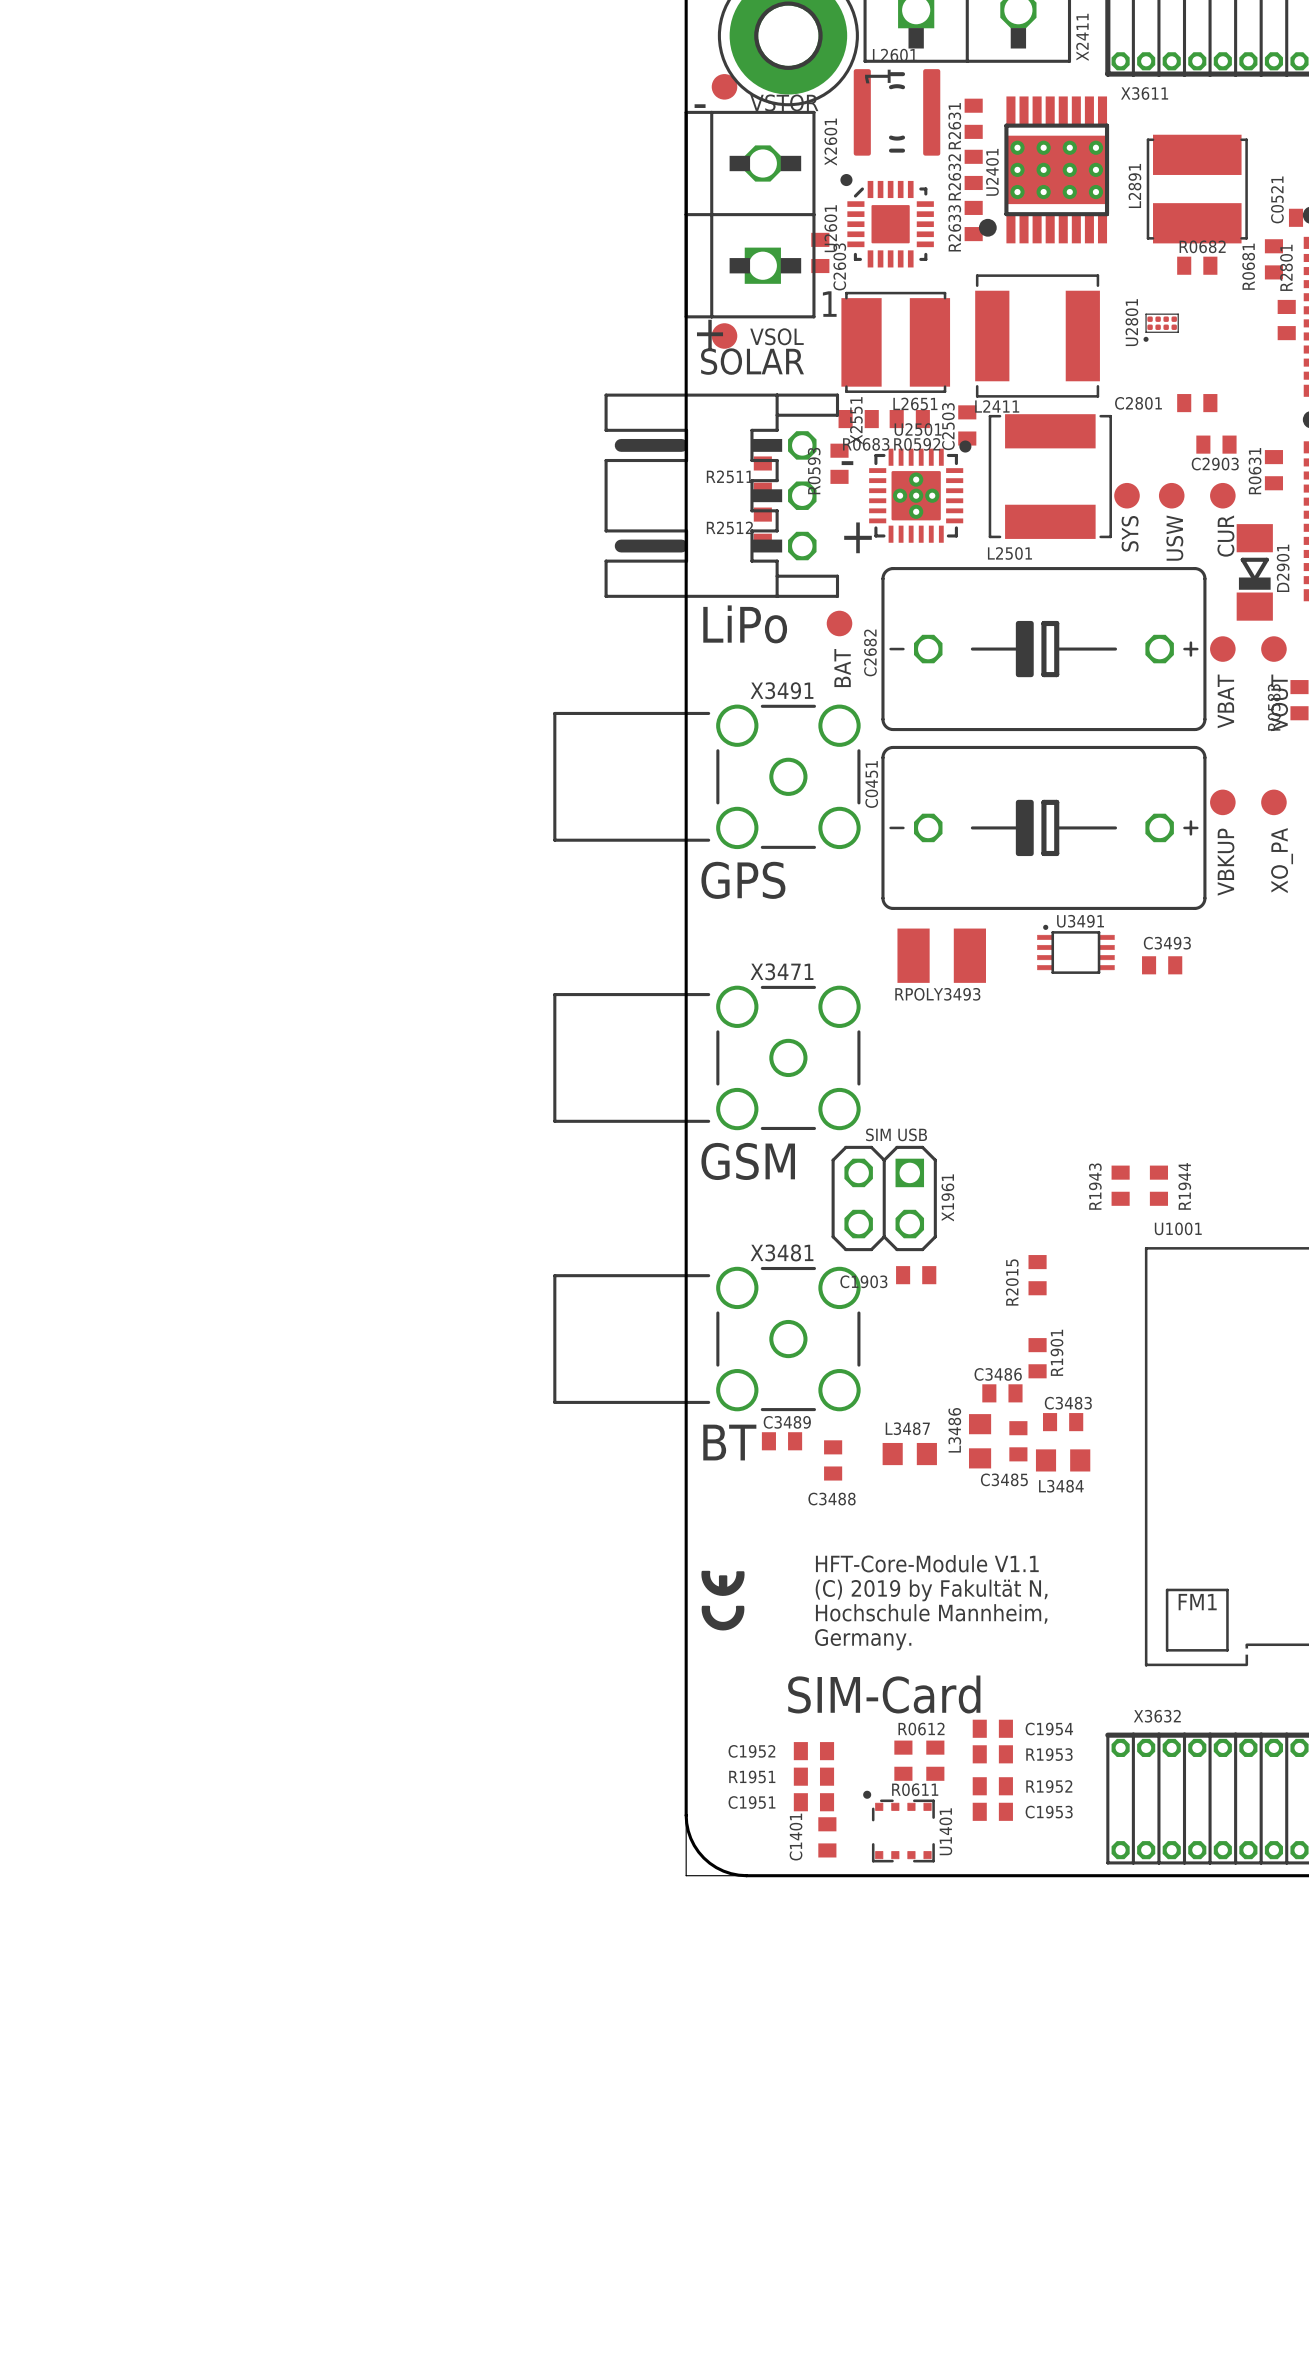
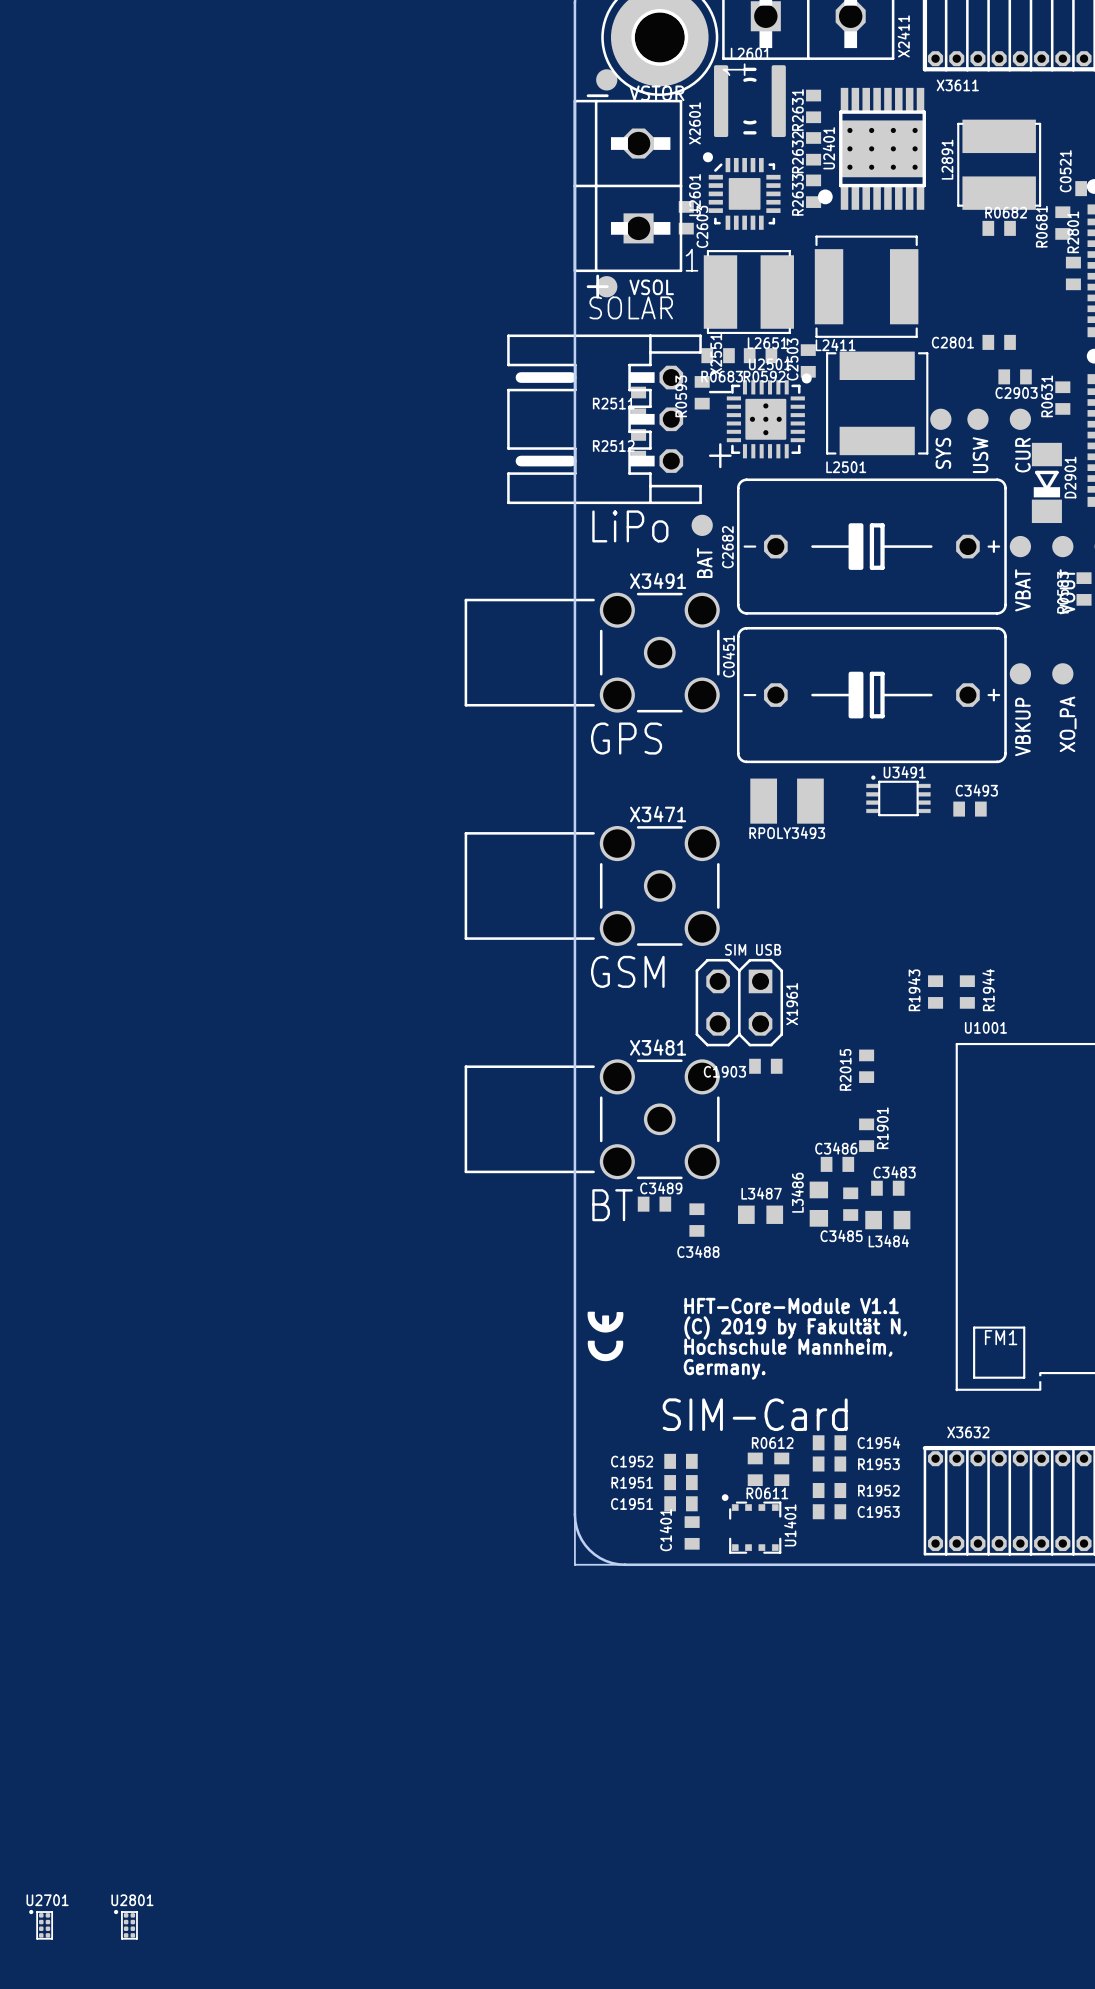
U2801 rotation: 0° (1161, 327) -> 90° clockwise (125, 1924)
U2801 position: (1161, 327) -> (125, 1924)
U2701: none -> (40, 1924)

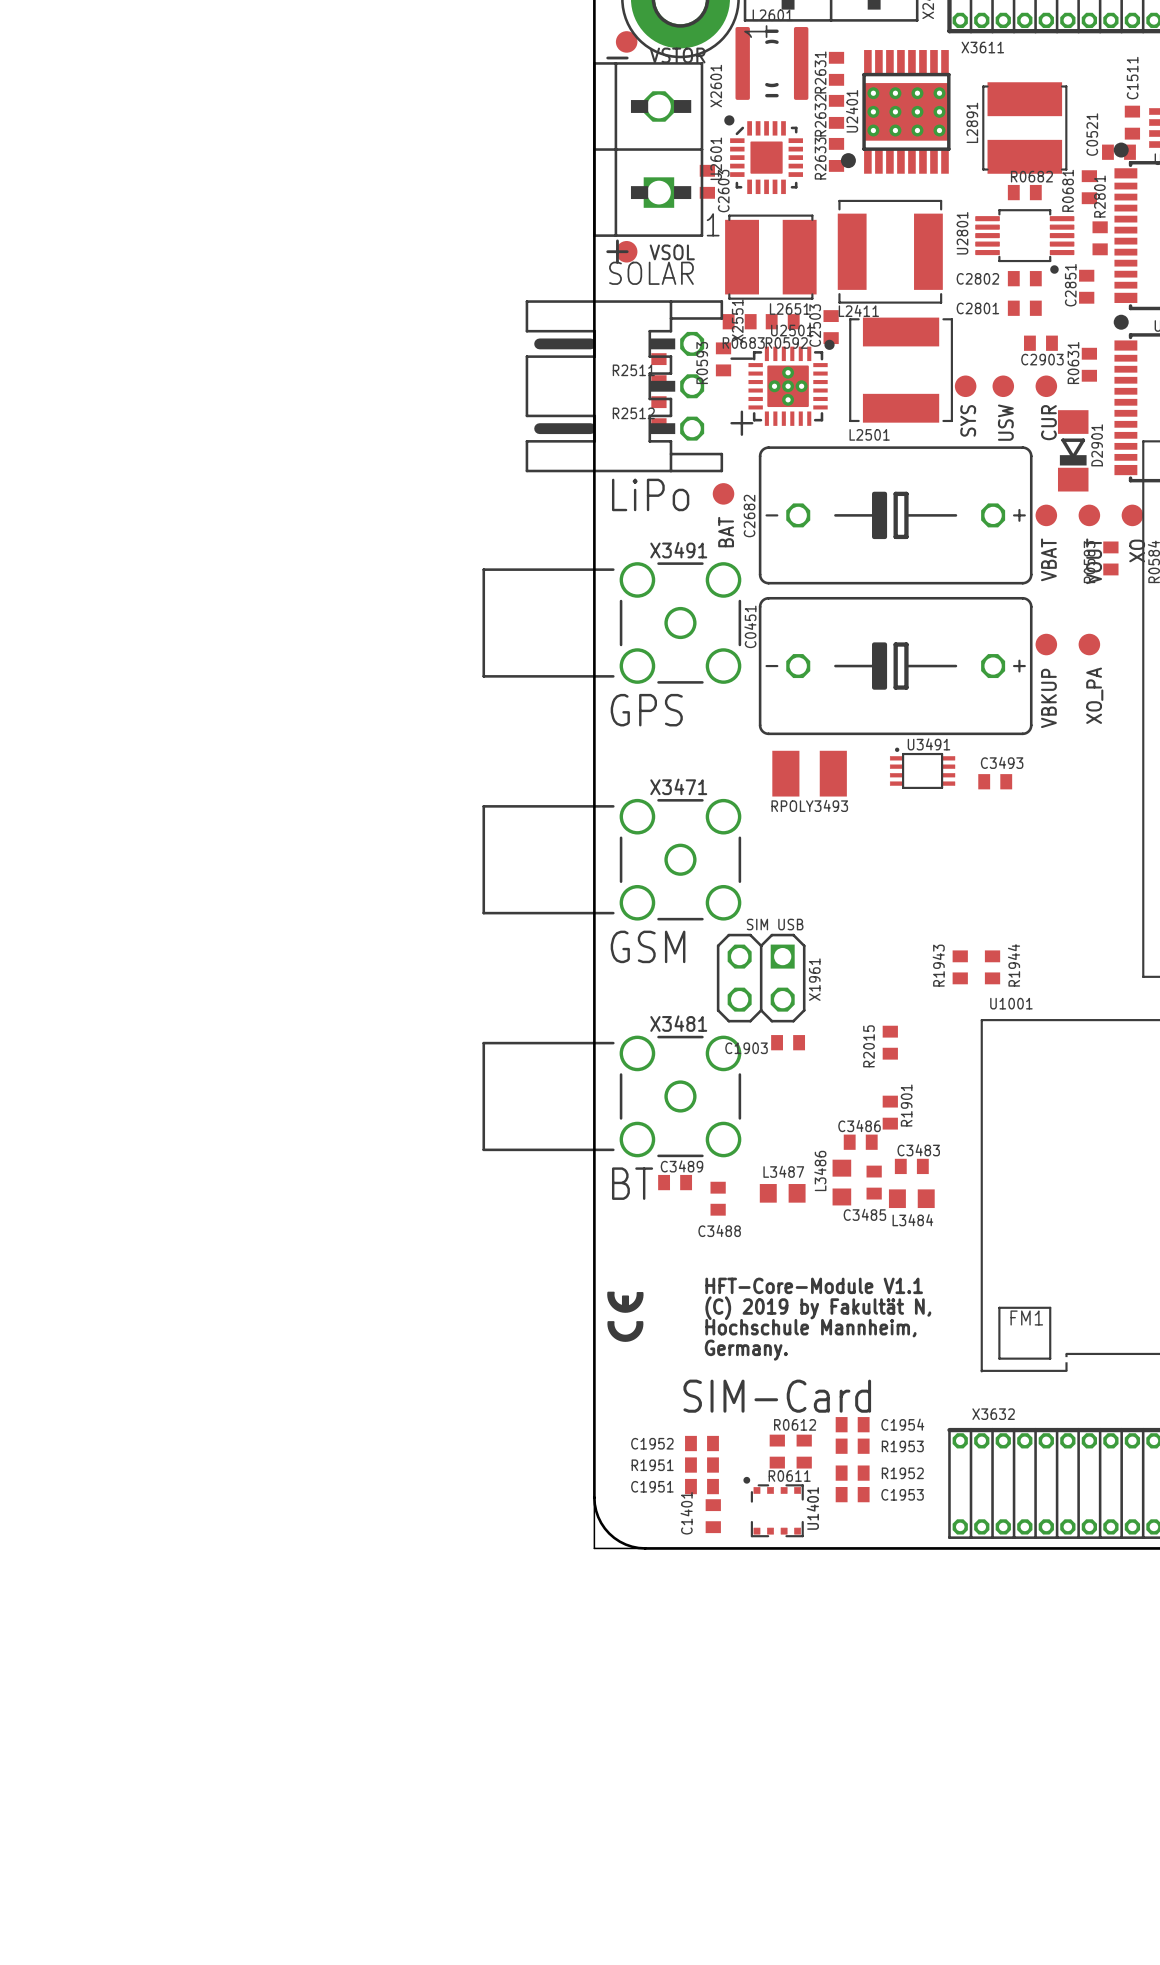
C2802: none -> (1024, 278)
C2851: none -> (1086, 286)
U2801 name position: U2801 (132, 1900) -> U2801 (962, 233)
U2801 footprint: [114, 1909, 138, 1940] -> [975, 209, 1075, 274]
U2701: (40, 1924) -> none

